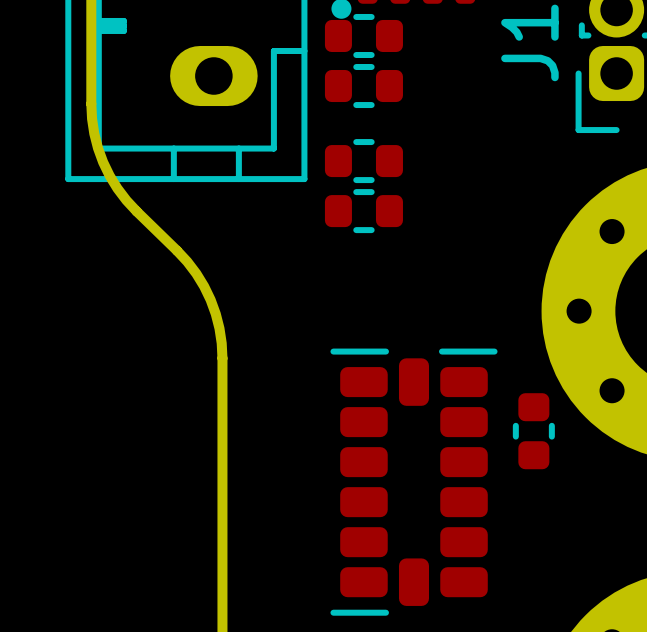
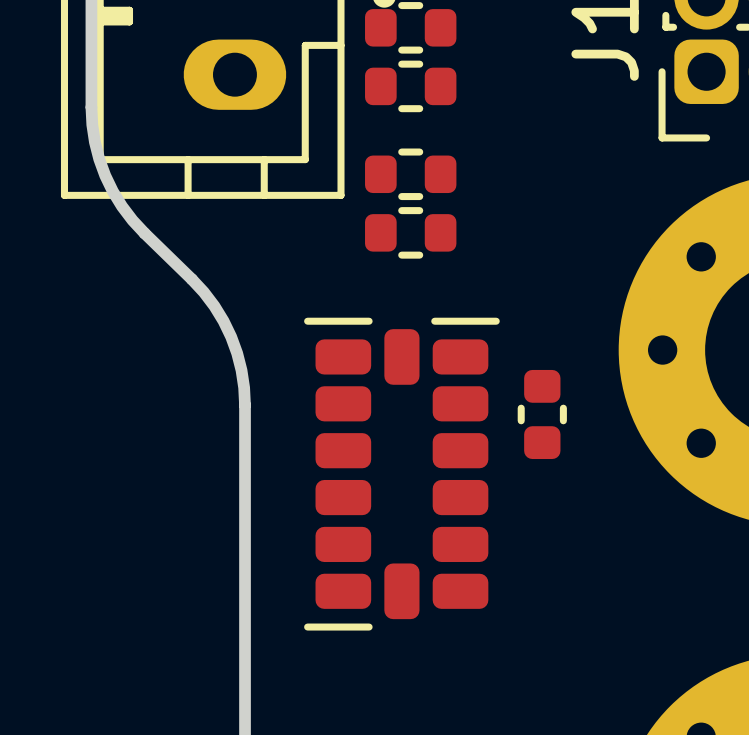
part position: (533, 431) -> (542, 414)
part position: (413, 482) -> (401, 474)

